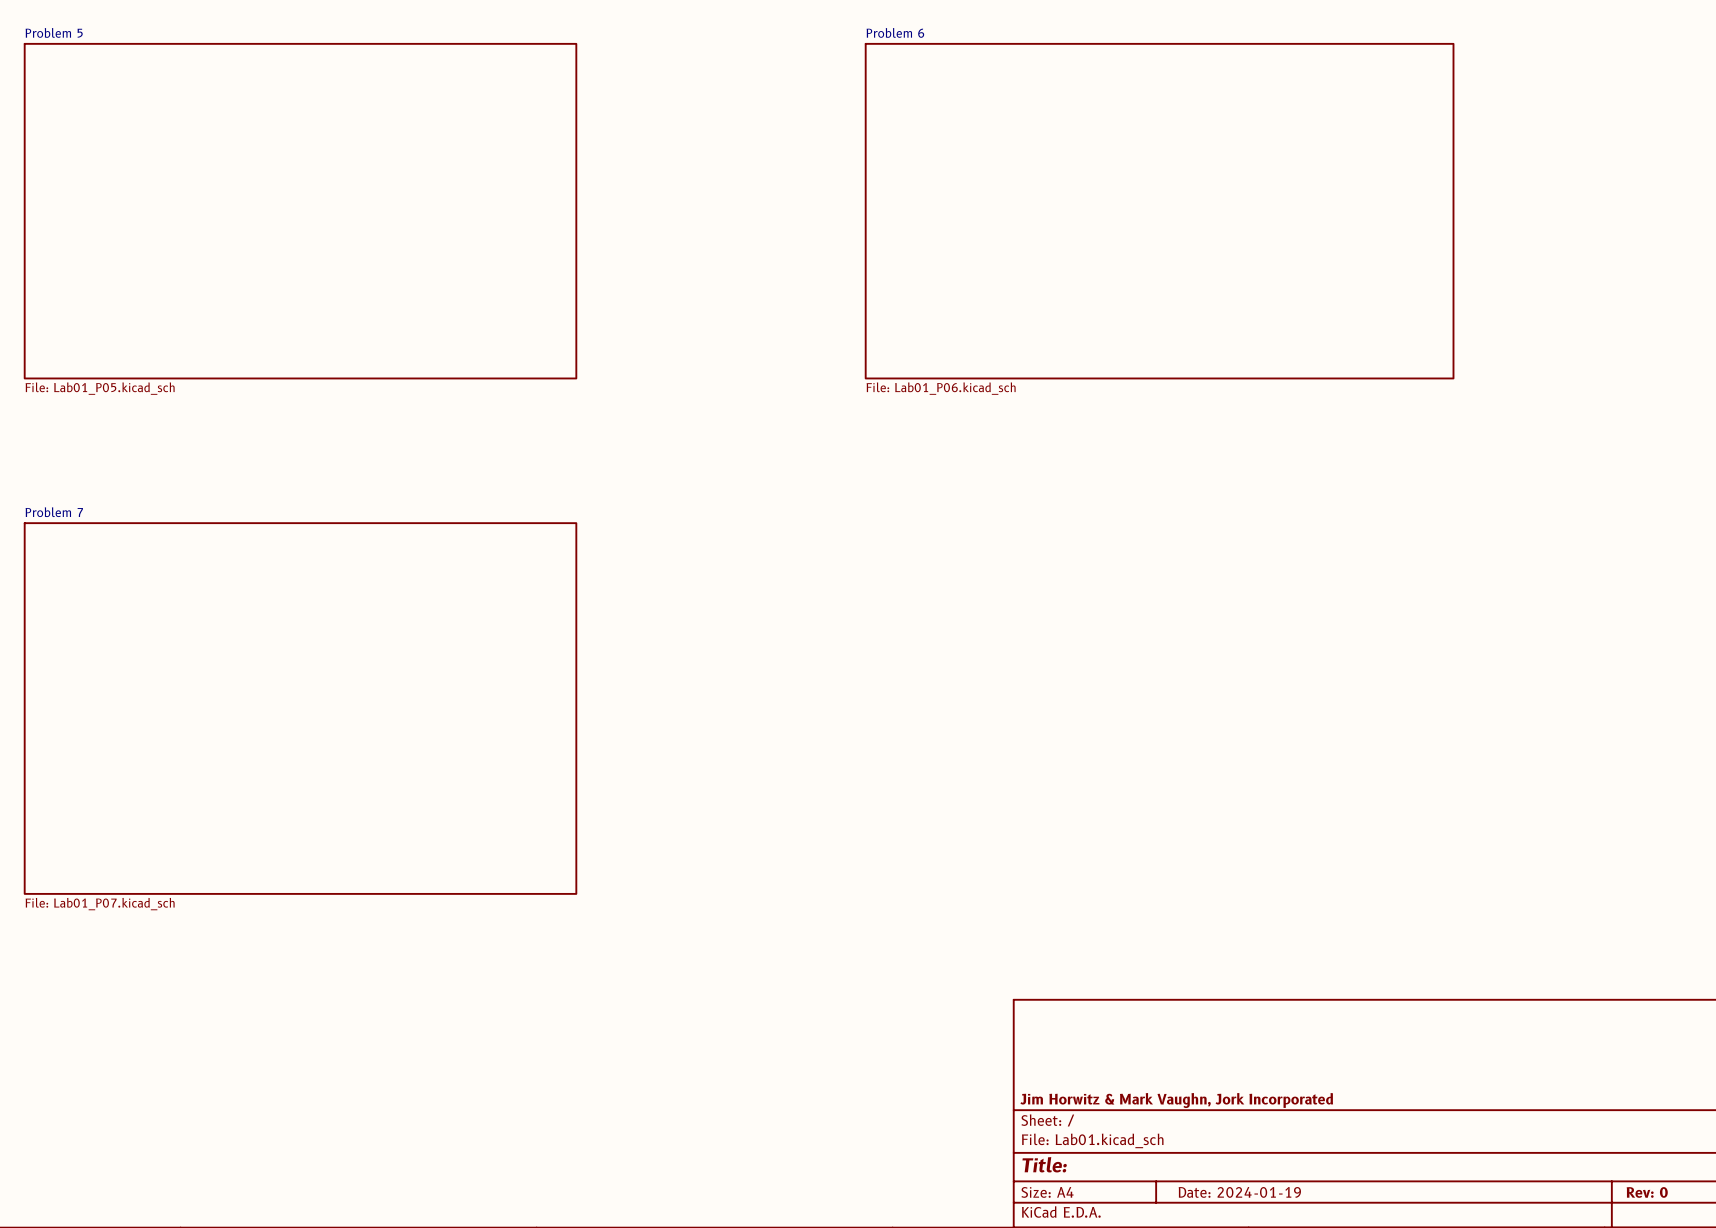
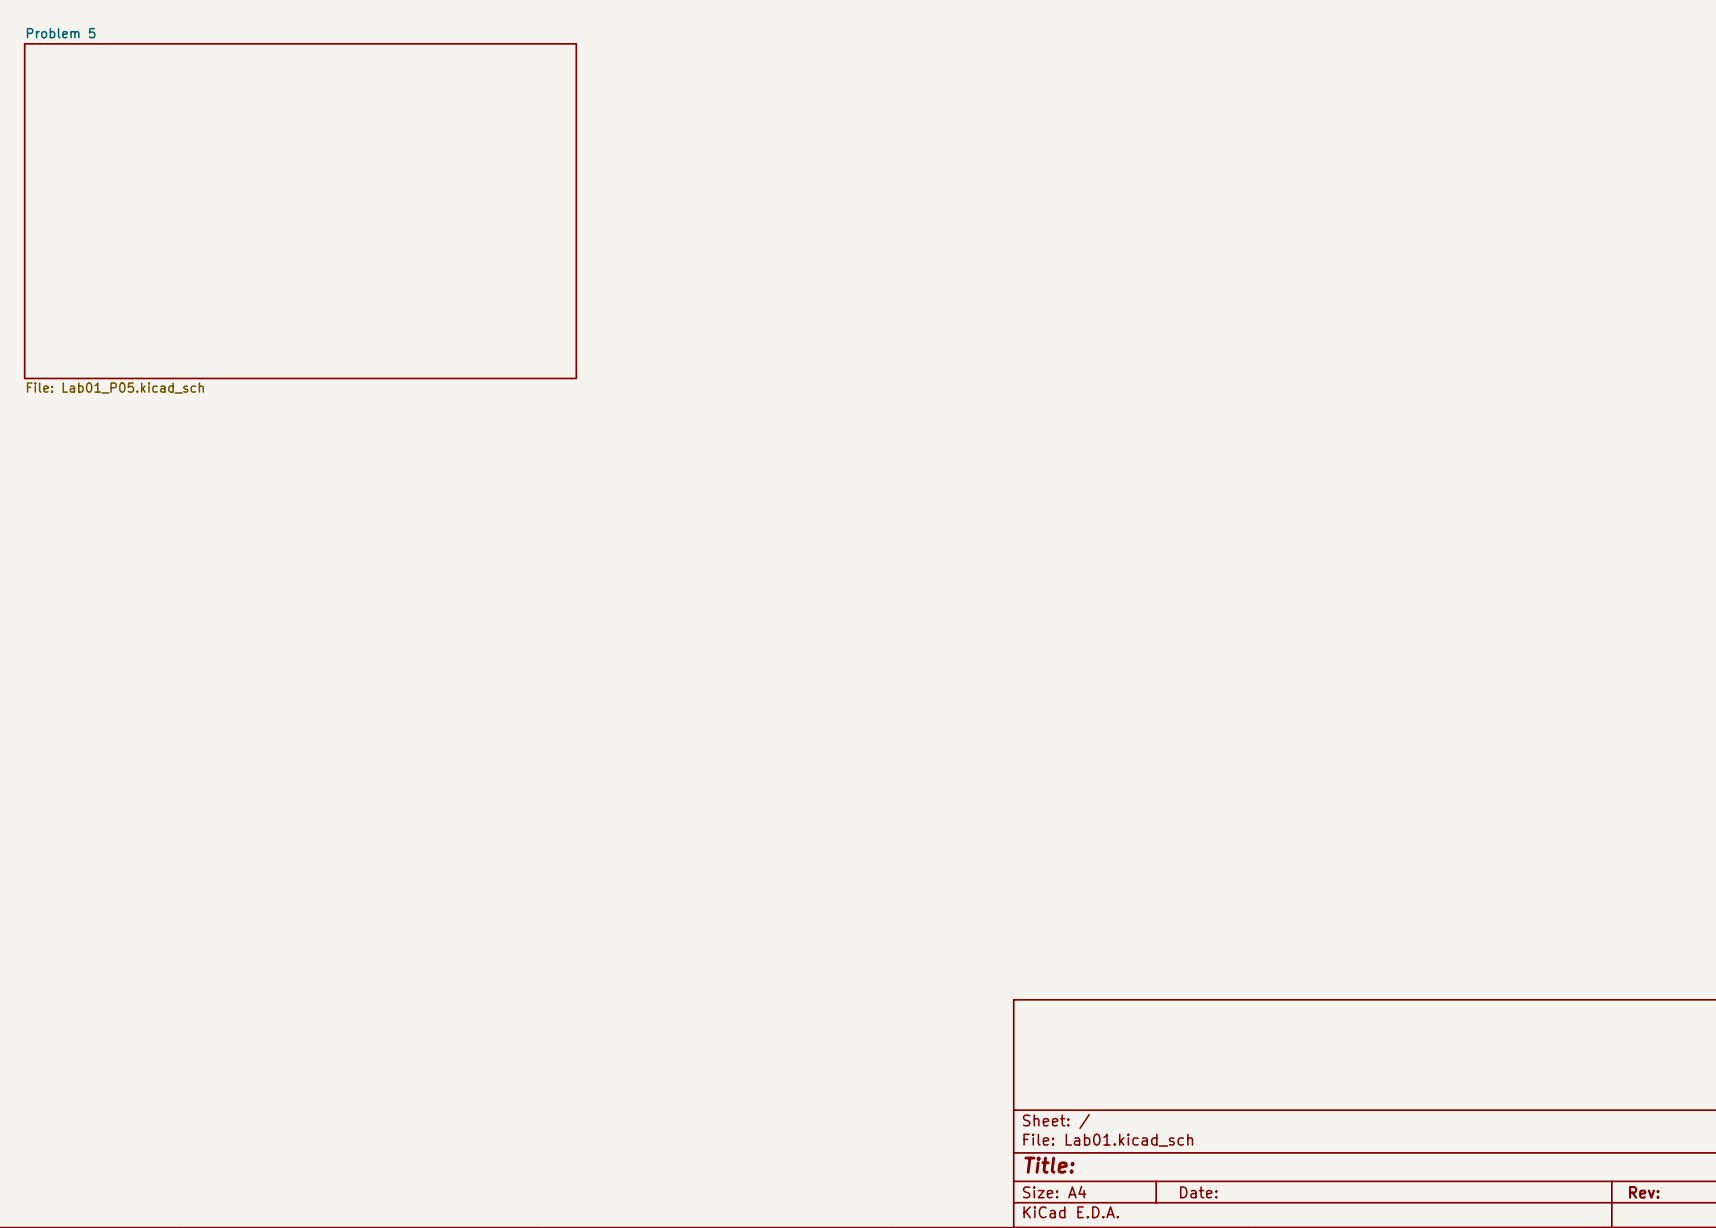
sheet Problem 6: File: Lab01_P06.kicad_sch (1159, 211) -> none
sheet Problem 7: File: Lab01_P07.kicad_sch (300, 708) -> none
title block: Jim Horwitz & Mark Vaughn, Jork Incorporated (1176, 1100) -> none
title block: Date: 2024-01-19 (1239, 1192) -> Date: (1198, 1192)
title block: Rev: 0 (1647, 1192) -> Rev: (1644, 1192)

